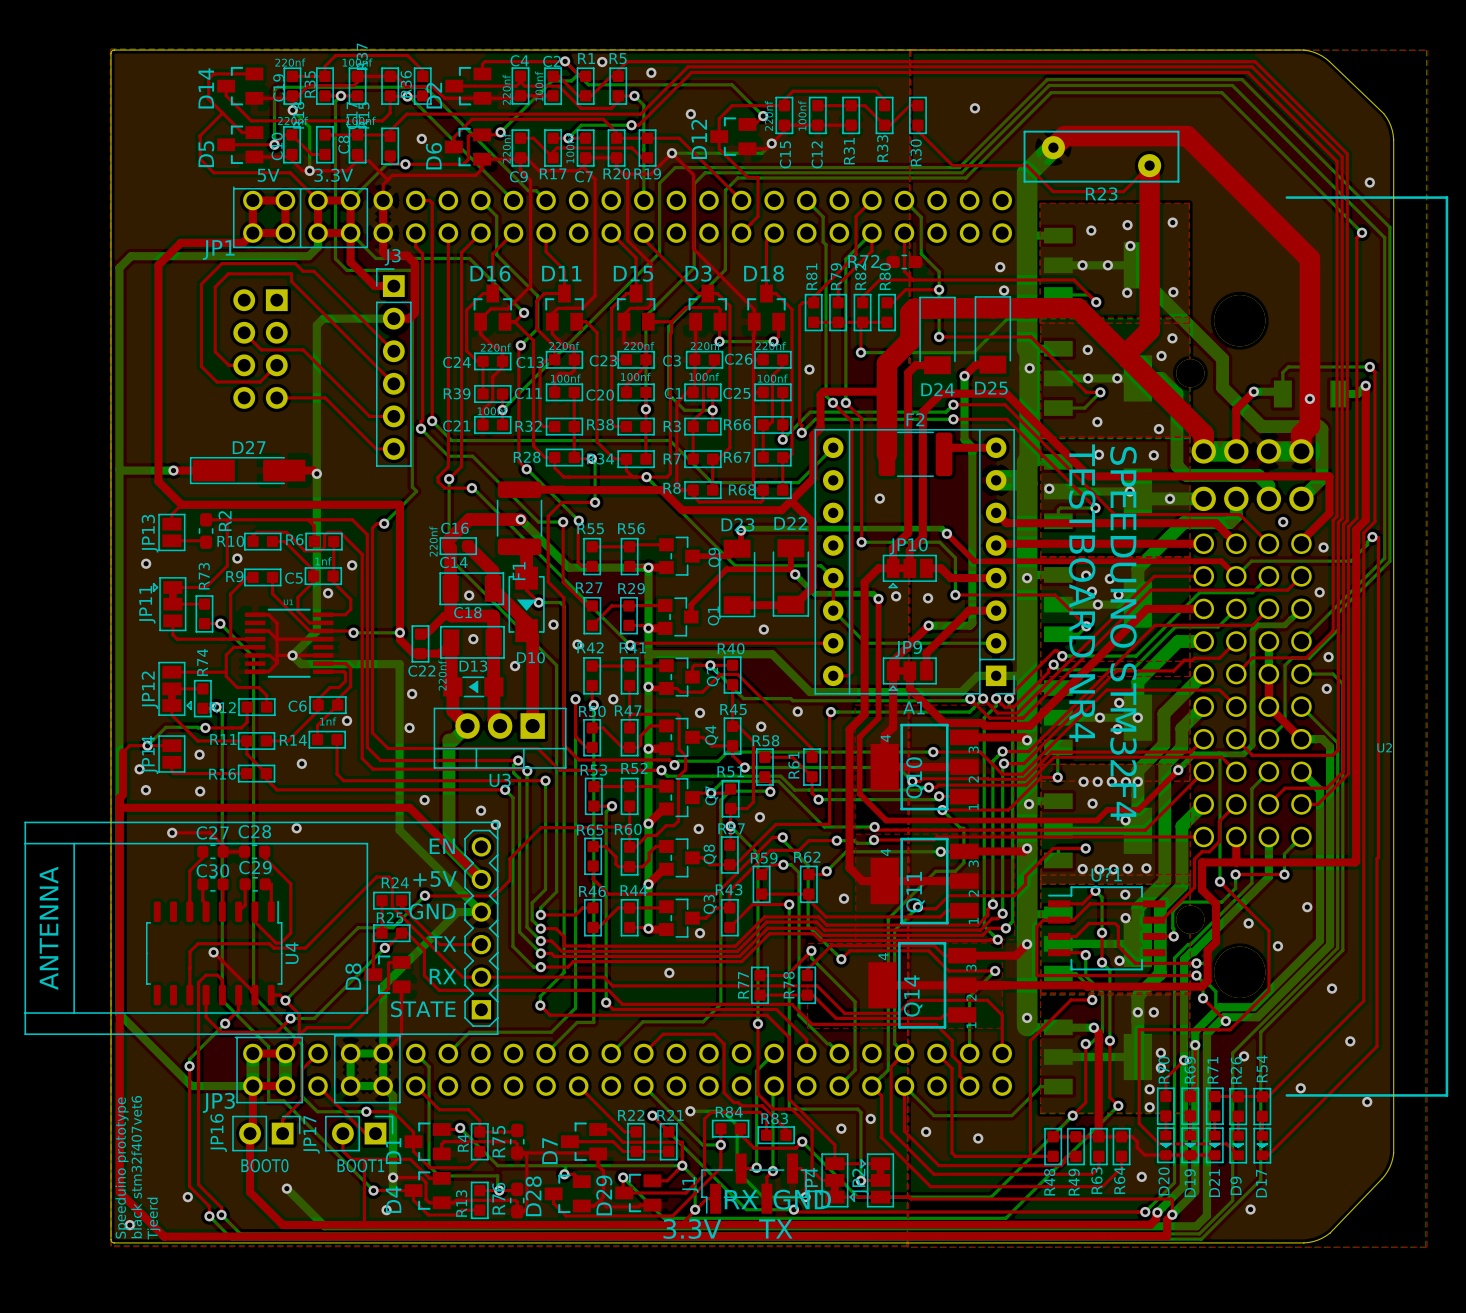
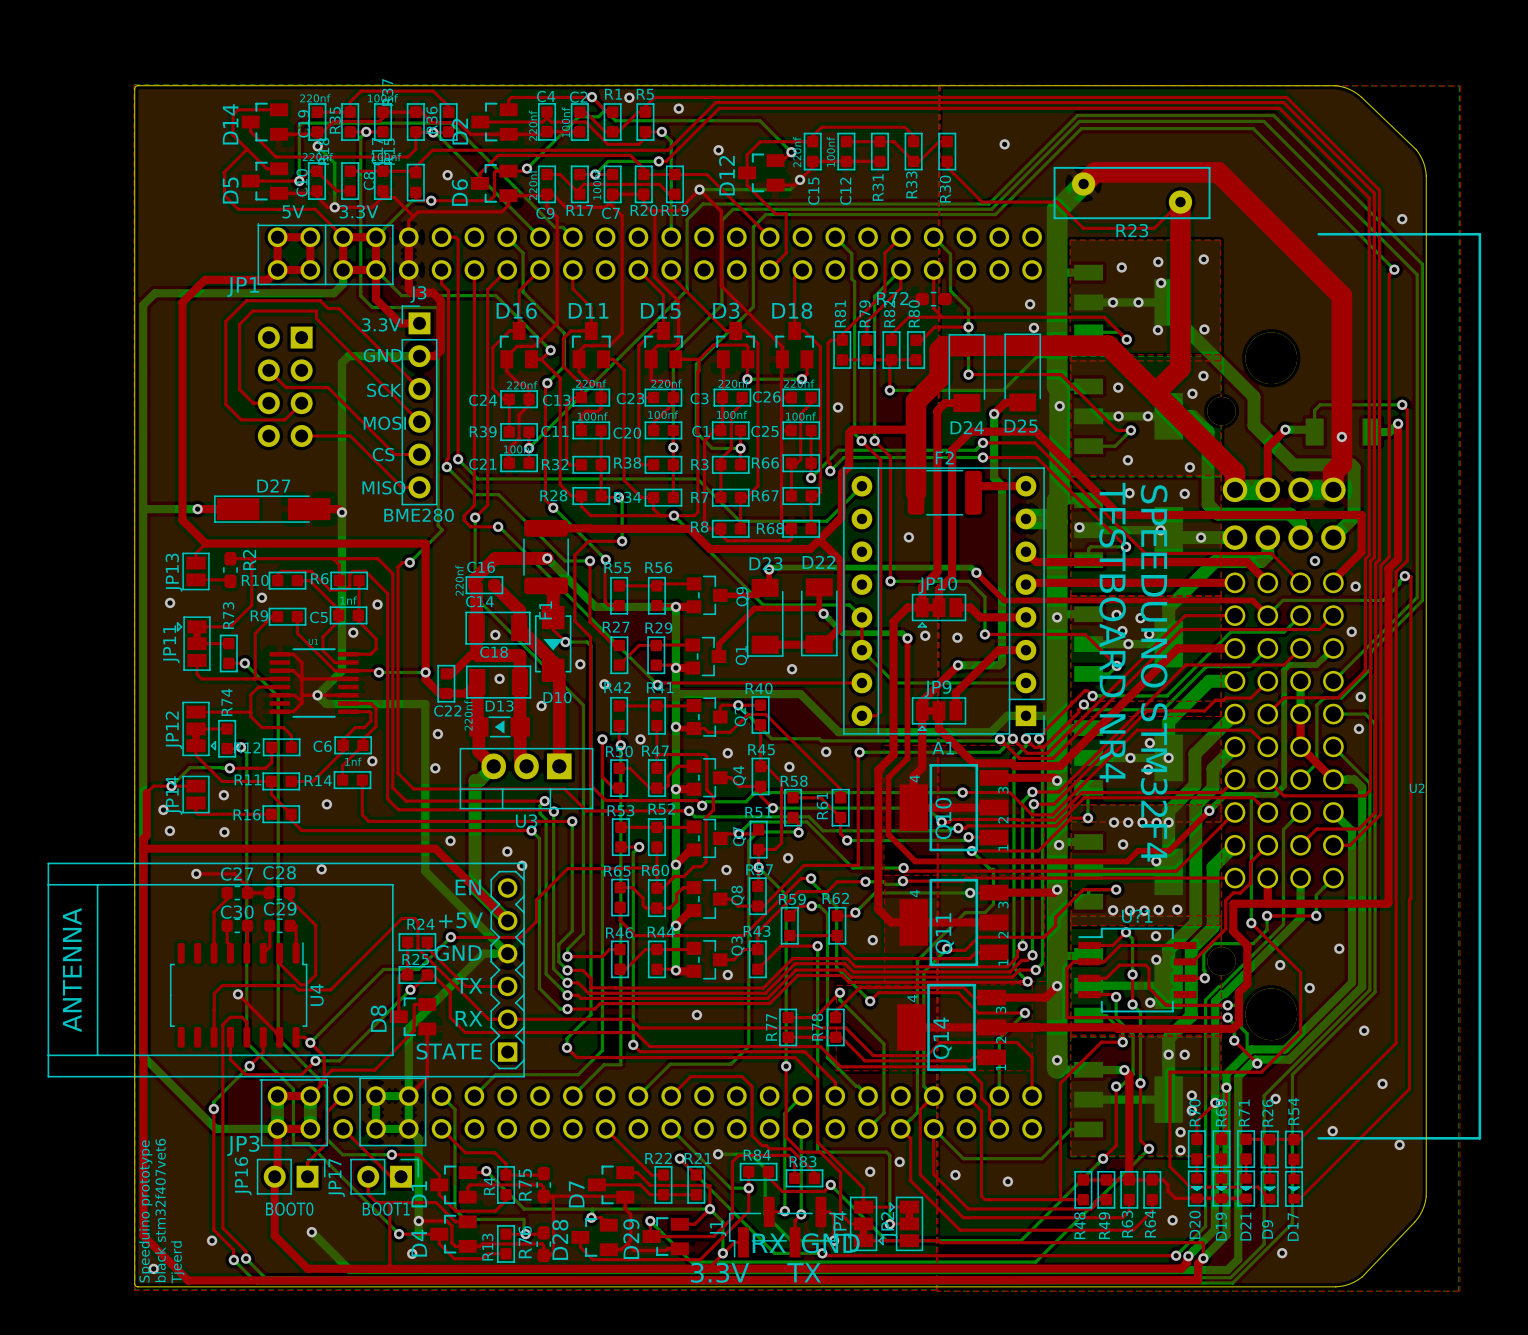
text: none -> 3.3V (381, 324)
text: none -> GND (382, 355)
text: none -> SCK (384, 390)
text: none -> MOSI (384, 423)
text: none -> CS (383, 454)
text: none -> MISO (383, 487)
text: none -> BME280 (419, 515)

